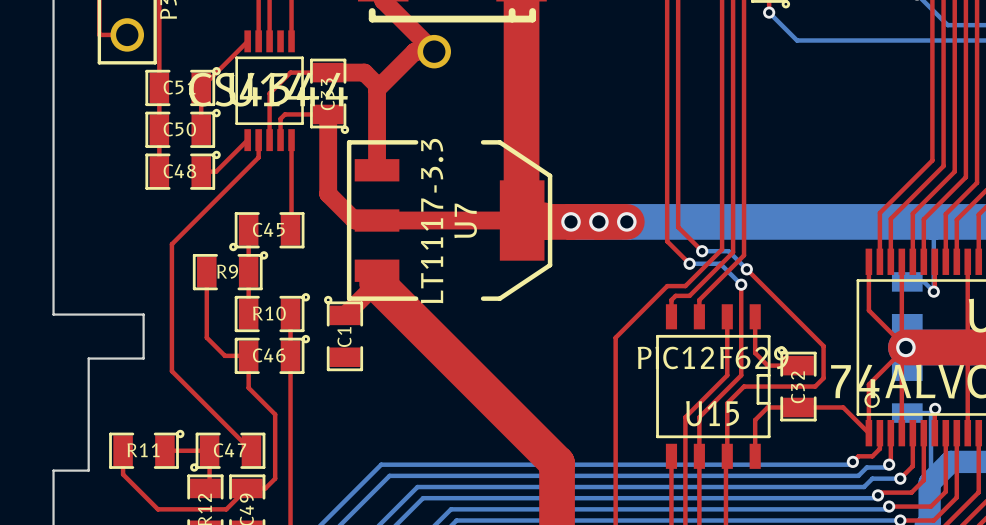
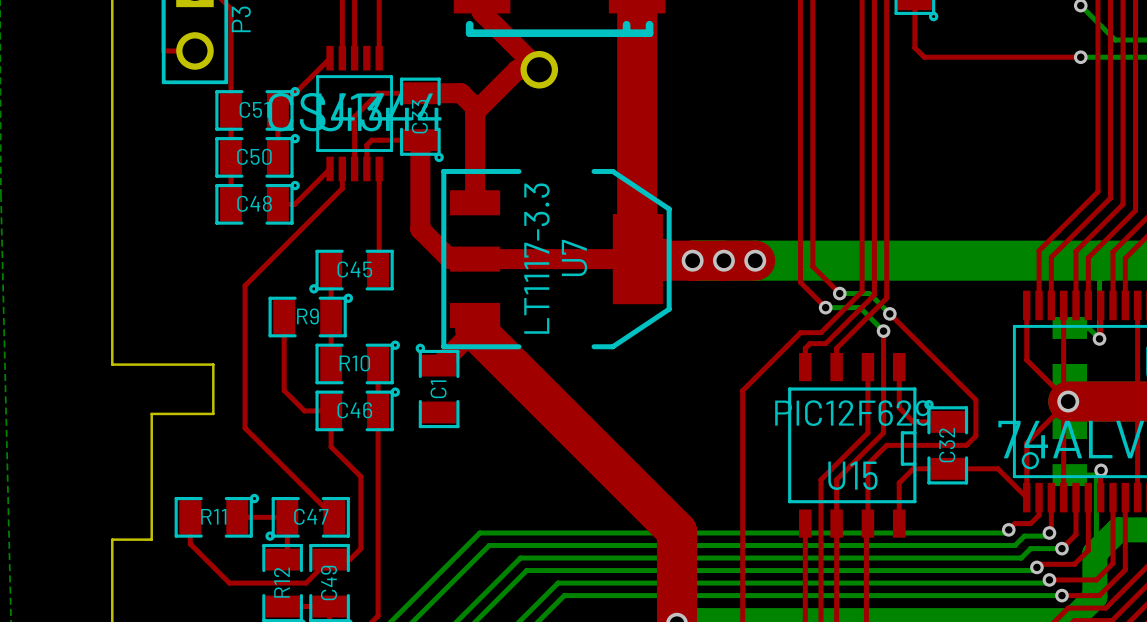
top track: none -> (914, 25) (914, 47) (924, 57) (1080, 57)
bottom track: (769, 12) (797, 40) (917, 40) -> none
via: (769, 12) -> none
via: none -> (1080, 57)

